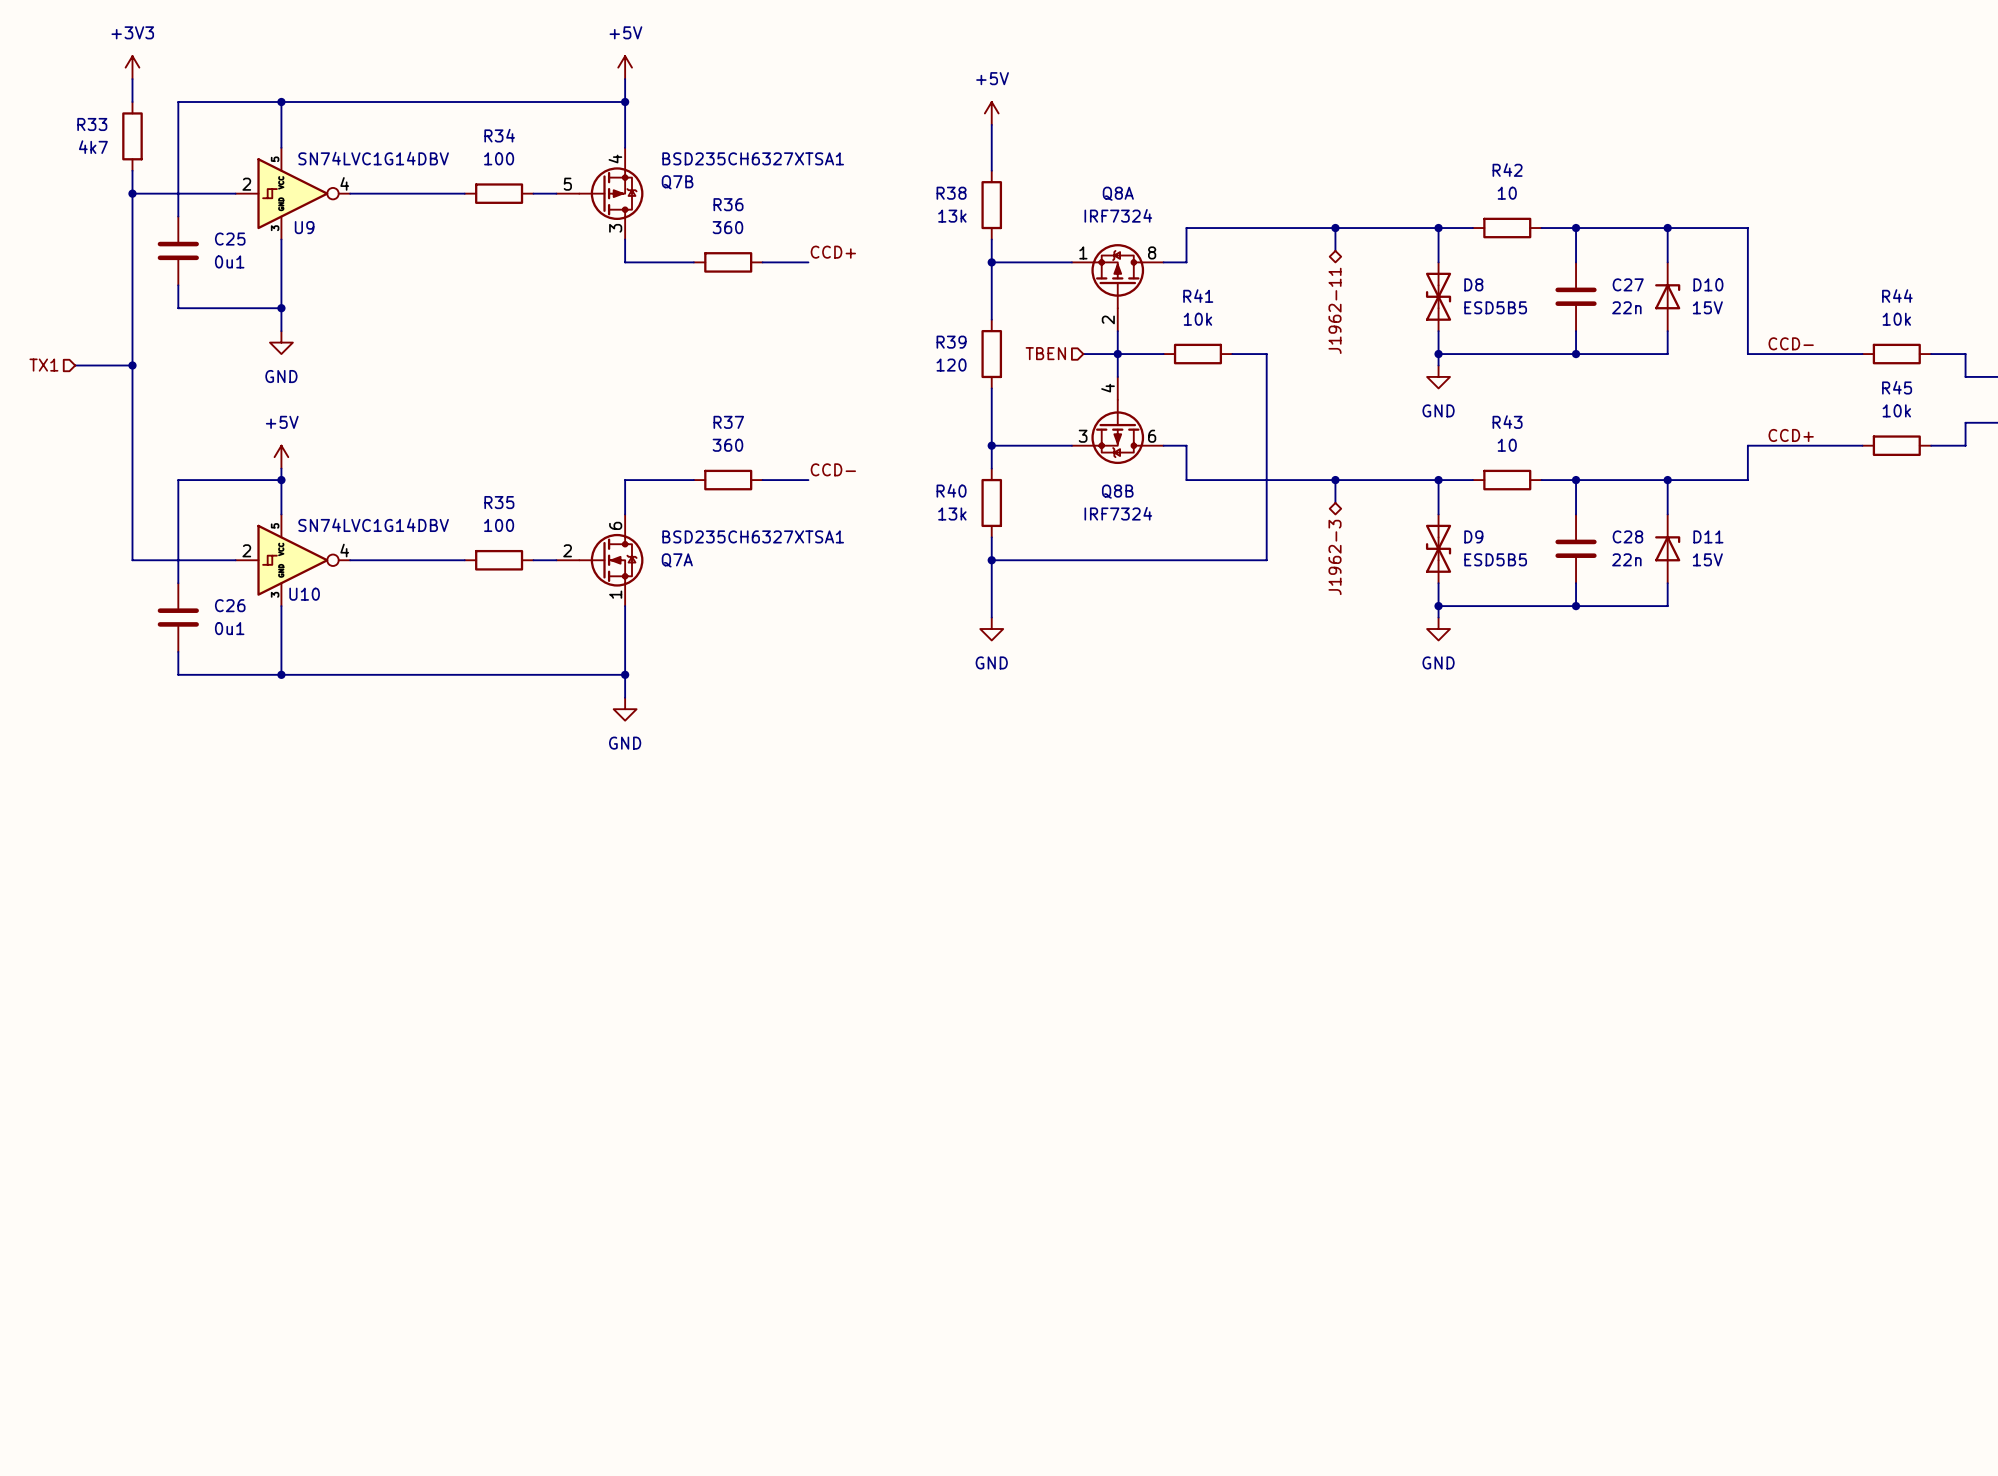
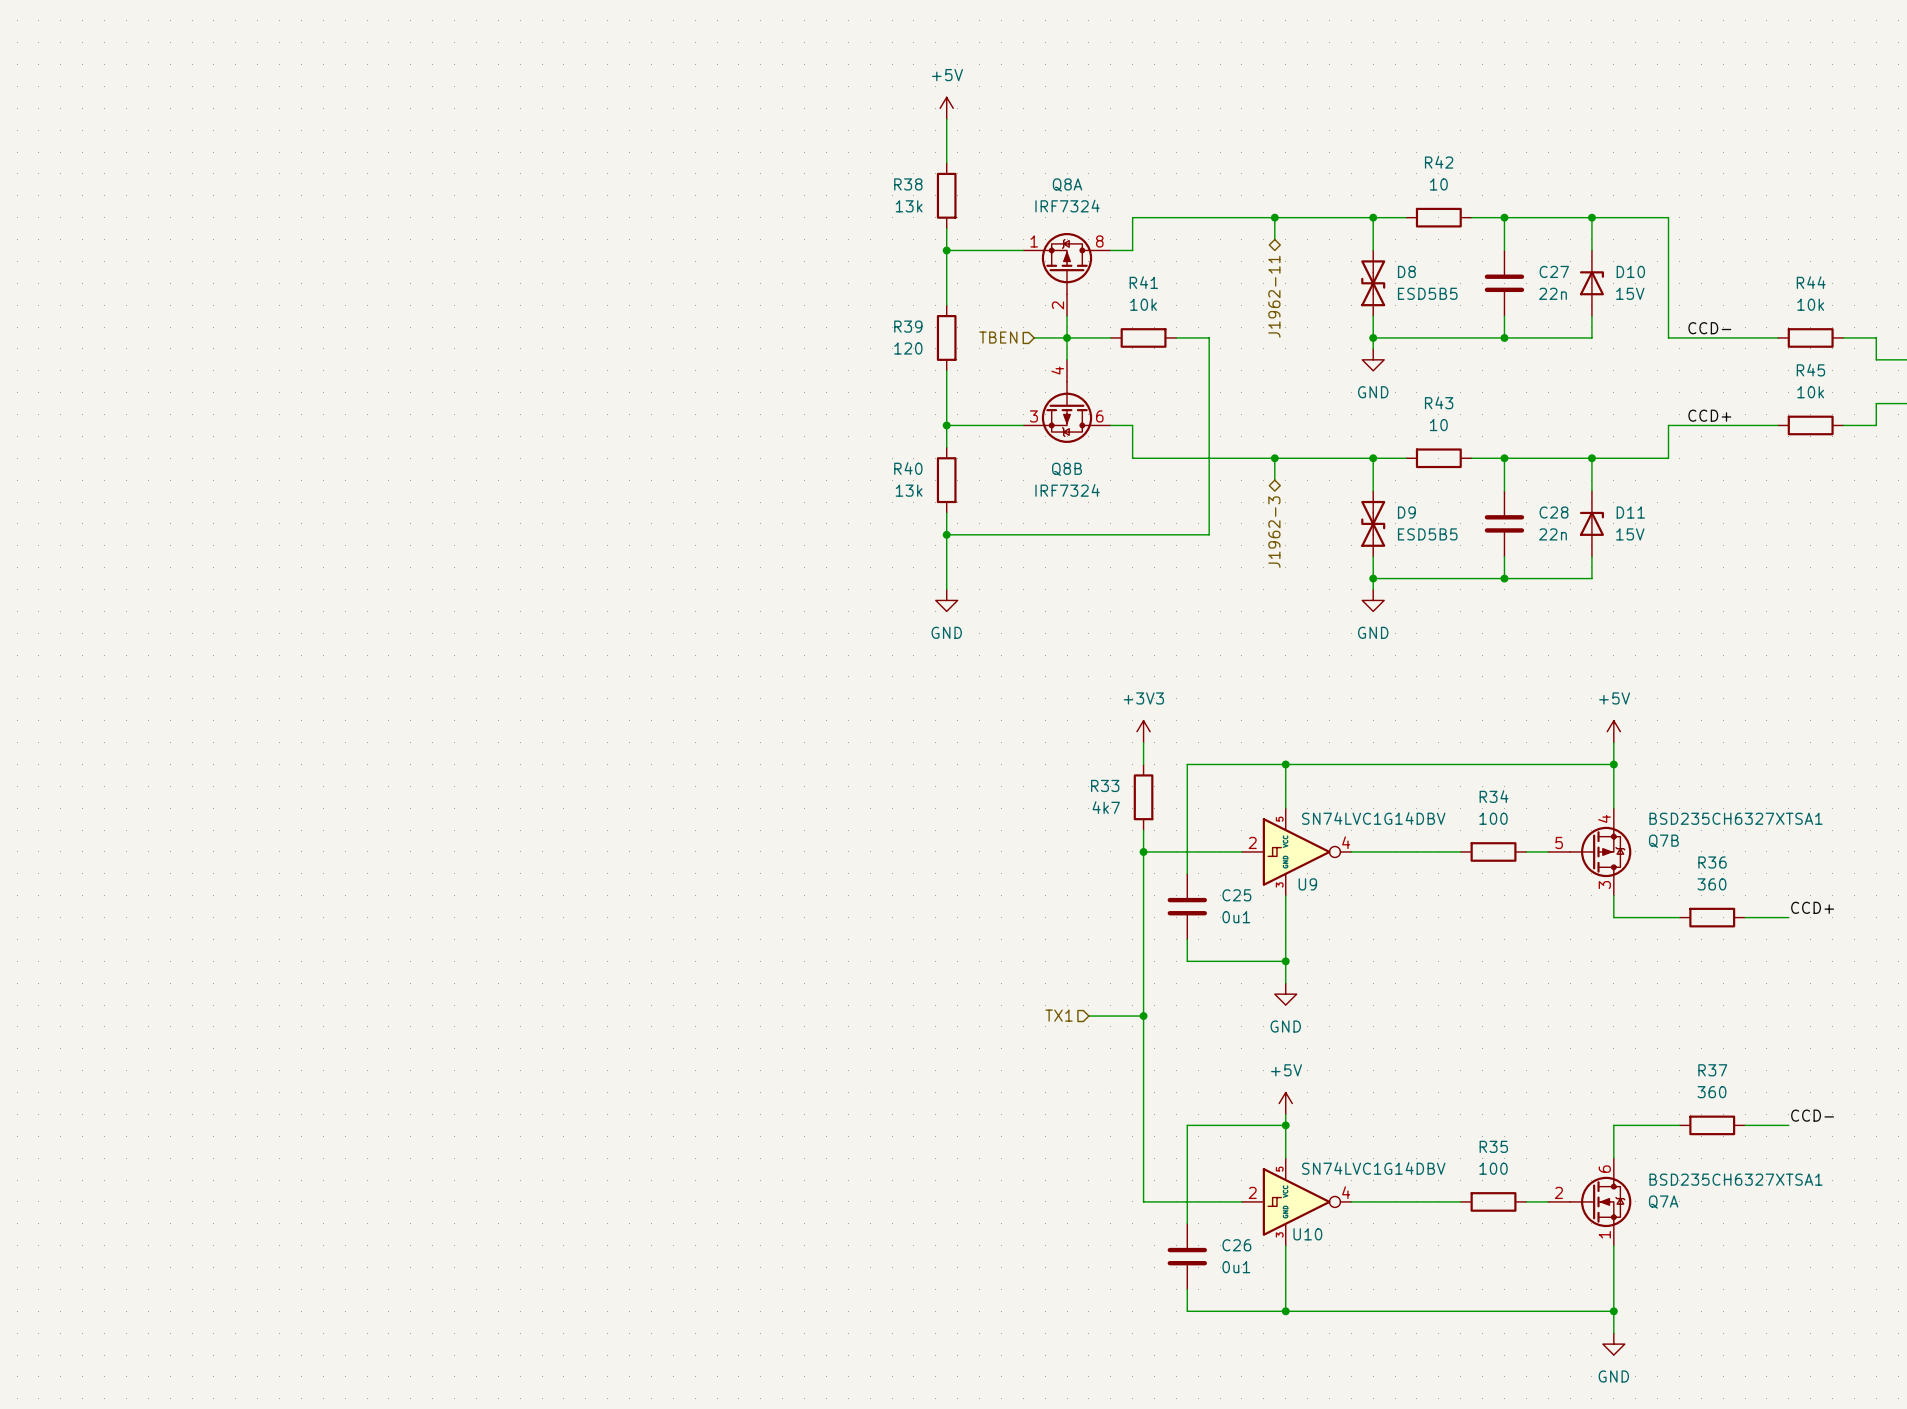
power symbol: +3V3 (132, 67) -> none
power symbol: +5V (625, 67) -> none
wire: (132, 79) (132, 102) -> none
wire: (625, 79) (625, 147) -> none
wire: (281, 102) (281, 147) -> none
junction: (281, 102) -> none
wire: (625, 102) (178, 102) (178, 216) -> none
junction: (625, 102) -> none
R33 position: (132, 136) -> (1143, 797)
wire: (132, 170) (132, 560) (235, 560) -> none
wire: (132, 193) (235, 193) -> none
junction: (132, 193) -> none
U9 position: (292, 193) -> (1296, 851)
wire: (350, 193) (464, 193) -> none
R34 position: (499, 193) -> (1493, 851)
wire: (533, 193) (556, 193) -> none
Q7B position: (599, 193) -> (1589, 851)
wire: (281, 239) (281, 331) -> none
wire: (625, 239) (625, 262) (693, 262) -> none
C25 position: (178, 250) -> (1187, 906)
label: CCD+ (833, 252) -> none
R36 position: (728, 262) -> (1712, 917)
wire: (762, 262) (808, 262) -> none
wire: (178, 285) (178, 308) (281, 308) -> none
junction: (281, 308) -> none
power symbol: GND (281, 342) -> none
hierarchical label: TX1 (43, 365) -> none
wire: (75, 365) (132, 365) -> none
junction: (132, 365) -> none
power symbol: +5V (281, 457) -> none
wire: (281, 468) (281, 514) -> none
label: CCD- (833, 469) -> none
wire: (281, 480) (178, 480) (178, 583) -> none
junction: (281, 480) -> none
wire: (693, 480) (625, 480) (625, 514) -> none
R37 position: (728, 480) -> (1712, 1125)
wire: (762, 480) (808, 480) -> none
U10 position: (292, 560) -> (1296, 1201)
wire: (350, 560) (464, 560) -> none
R35 position: (499, 560) -> (1493, 1201)
wire: (533, 560) (556, 560) -> none
Q7A position: (599, 560) -> (1589, 1201)
wire: (281, 606) (281, 674) -> none
wire: (625, 606) (625, 697) -> none
C26 position: (178, 617) -> (1187, 1256)
wire: (178, 651) (178, 674) (625, 674) -> none
junction: (281, 674) -> none
junction: (625, 674) -> none
power symbol: GND (625, 709) -> none
power symbol: none -> +3V3 (1143, 731)
power symbol: none -> +5V (1613, 731)
wire: none -> (1143, 742) (1143, 764)
wire: none -> (1613, 742) (1613, 808)
wire: none -> (1285, 764) (1285, 808)
junction: none -> (1285, 764)
wire: none -> (1613, 764) (1187, 764) (1187, 873)
junction: none -> (1613, 764)
wire: none -> (1143, 830) (1143, 1201) (1241, 1201)
wire: none -> (1143, 851) (1241, 851)
junction: none -> (1143, 851)
wire: none -> (1351, 851) (1460, 851)
wire: none -> (1526, 851) (1548, 851)
wire: none -> (1285, 895) (1285, 983)
wire: none -> (1613, 895) (1613, 917) (1679, 917)
label: none -> CCD+ (1812, 907)
wire: none -> (1745, 917) (1788, 917)
wire: none -> (1187, 939) (1187, 961) (1285, 961)
junction: none -> (1285, 961)
power symbol: none -> GND (1285, 994)
hierarchical label: none -> TX1 (1059, 1015)
wire: none -> (1088, 1016) (1143, 1016)
junction: none -> (1143, 1016)
power symbol: none -> +5V (1285, 1103)
wire: none -> (1285, 1114) (1285, 1158)
label: none -> CCD- (1812, 1115)
wire: none -> (1285, 1125) (1187, 1125) (1187, 1223)
junction: none -> (1285, 1125)
wire: none -> (1679, 1125) (1613, 1125) (1613, 1158)
wire: none -> (1745, 1125) (1788, 1125)
wire: none -> (1351, 1201) (1460, 1201)
wire: none -> (1526, 1201) (1548, 1201)
wire: none -> (1285, 1245) (1285, 1311)
wire: none -> (1613, 1245) (1613, 1333)
wire: none -> (1187, 1289) (1187, 1311) (1613, 1311)
junction: none -> (1285, 1311)
junction: none -> (1613, 1311)
power symbol: none -> GND (1613, 1344)

